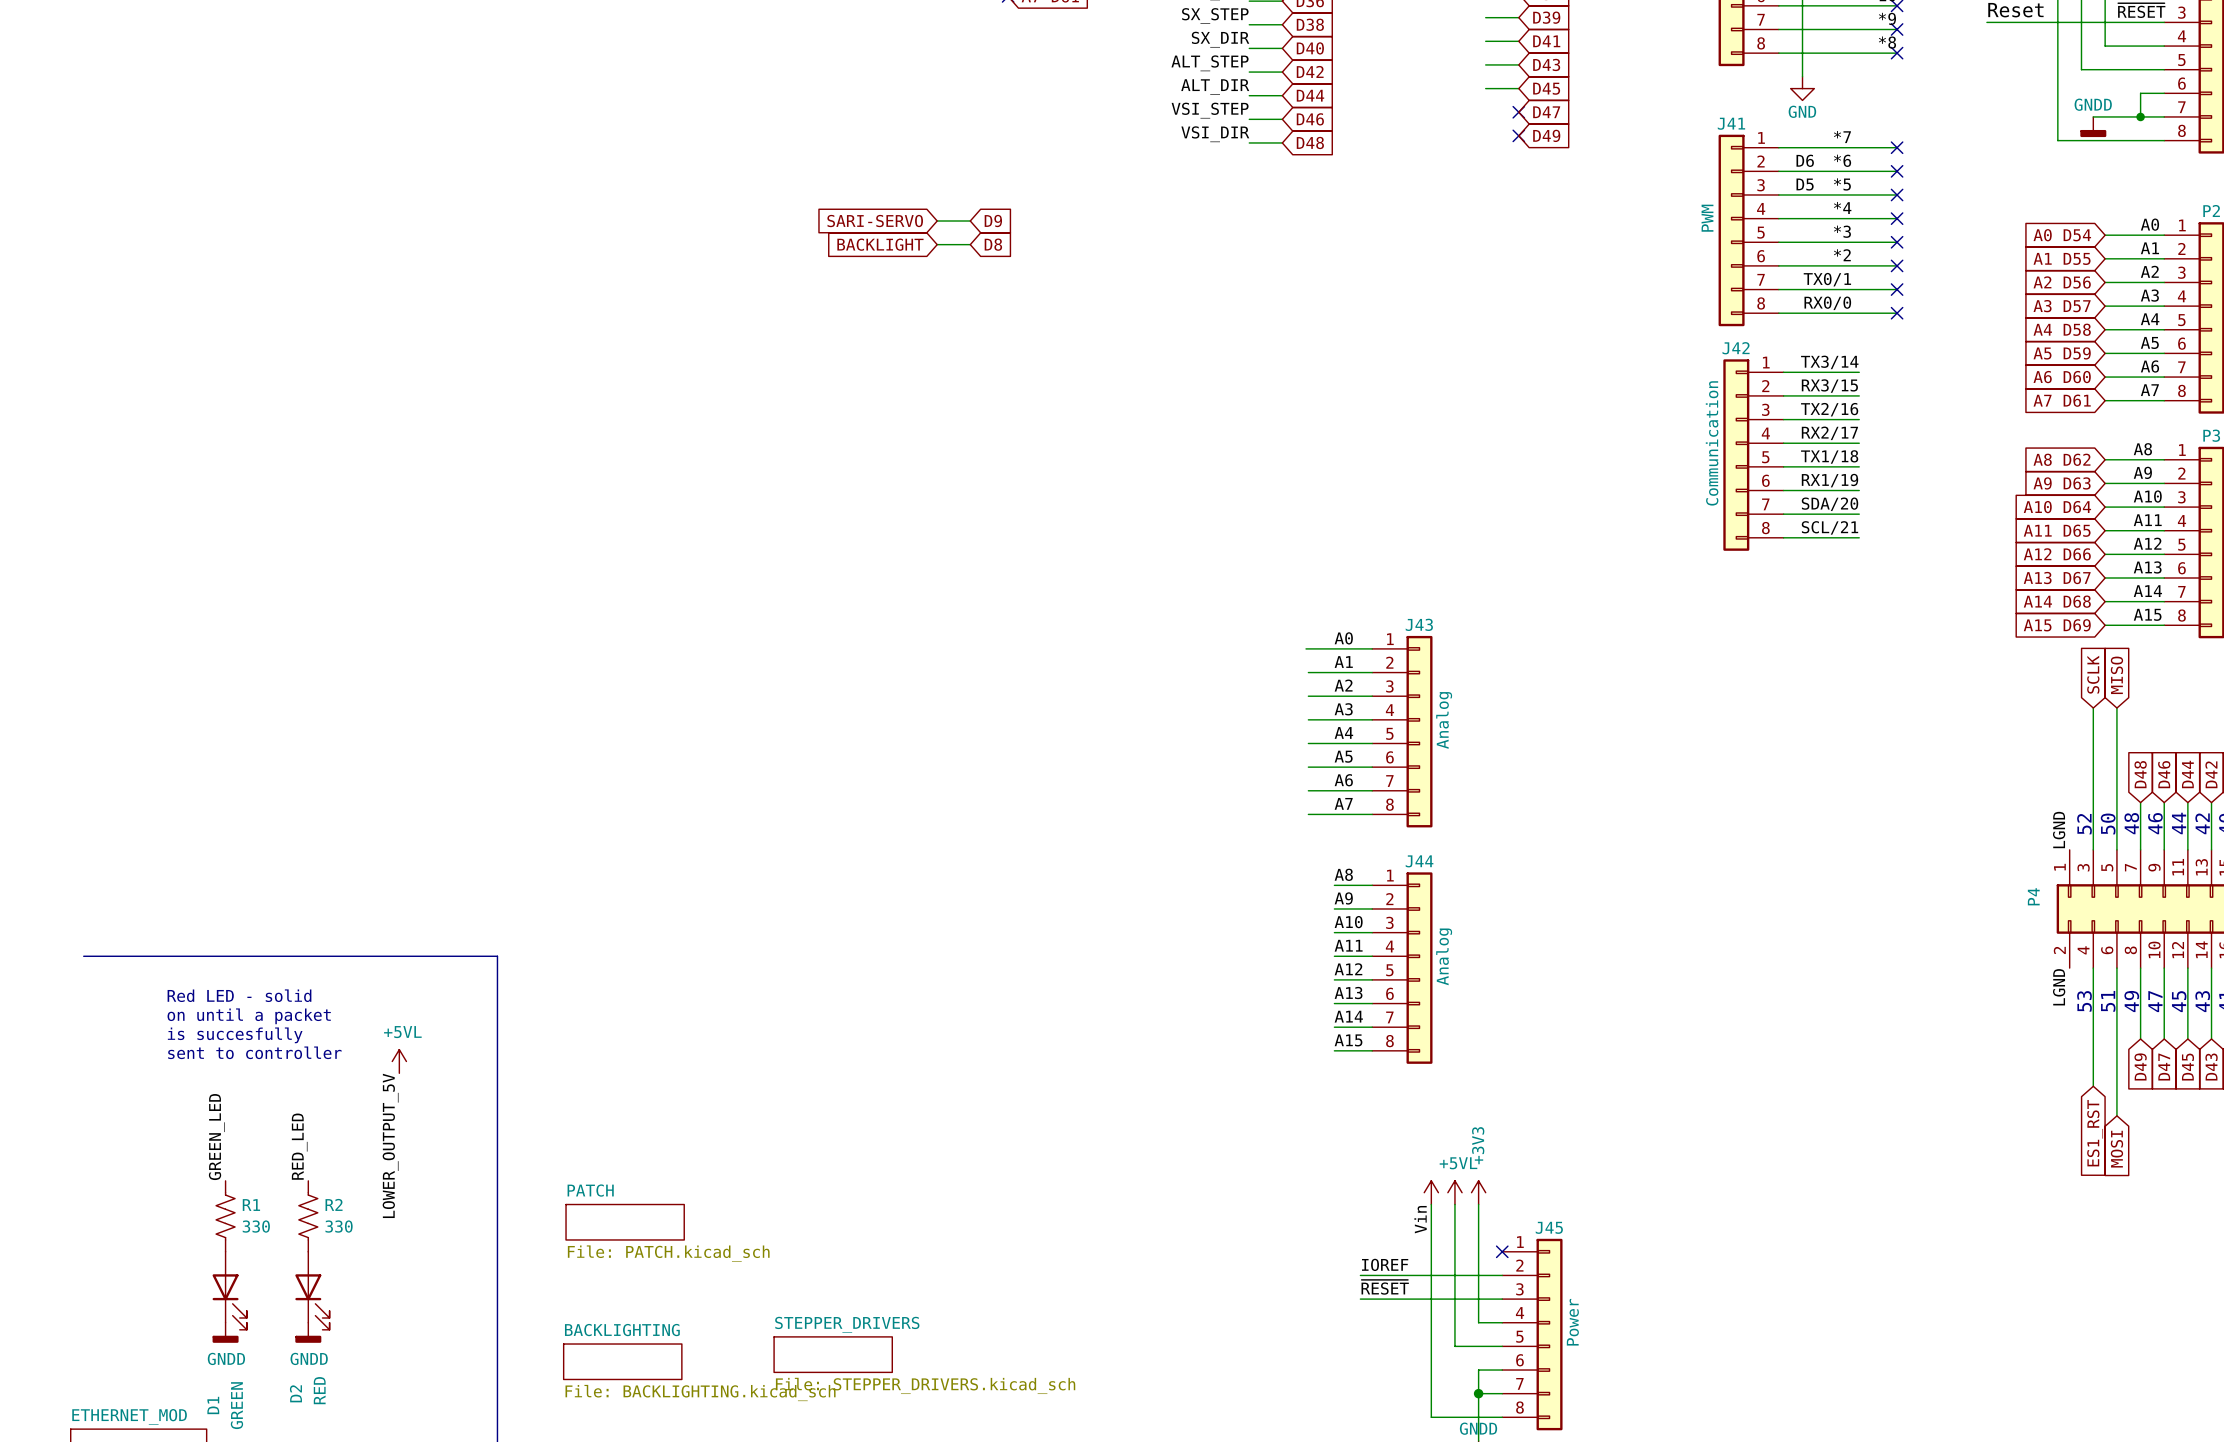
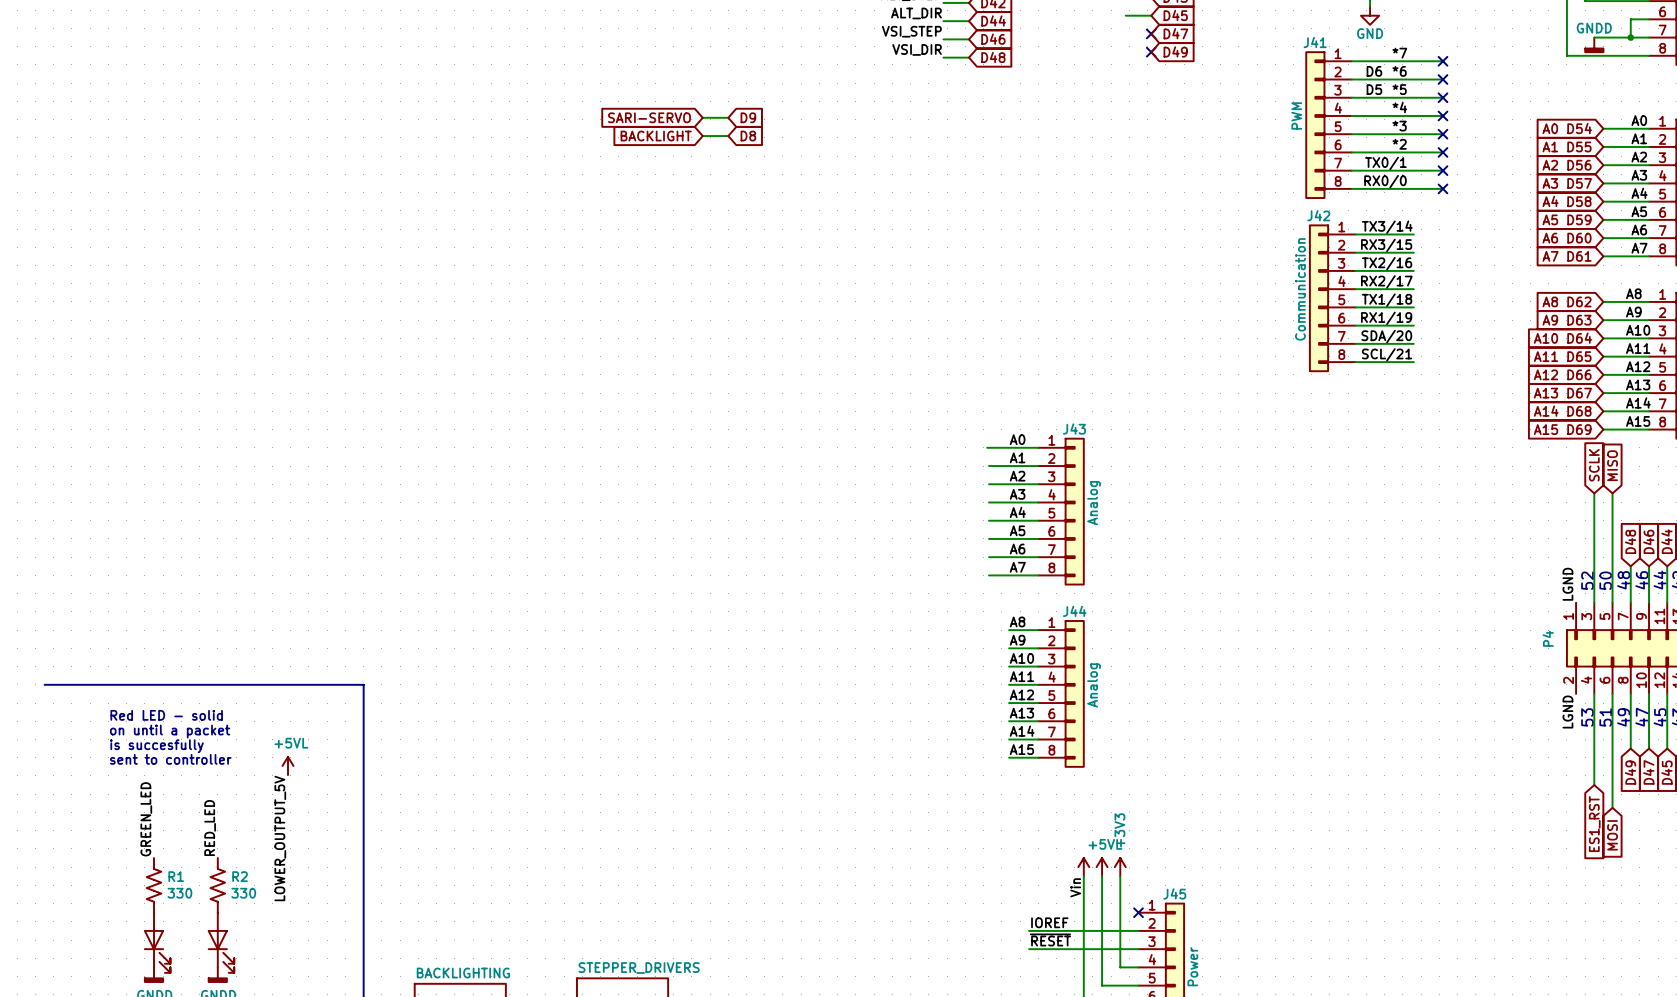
sheet PATCH: File: PATCH.kicad_sch (625, 1222) -> none

